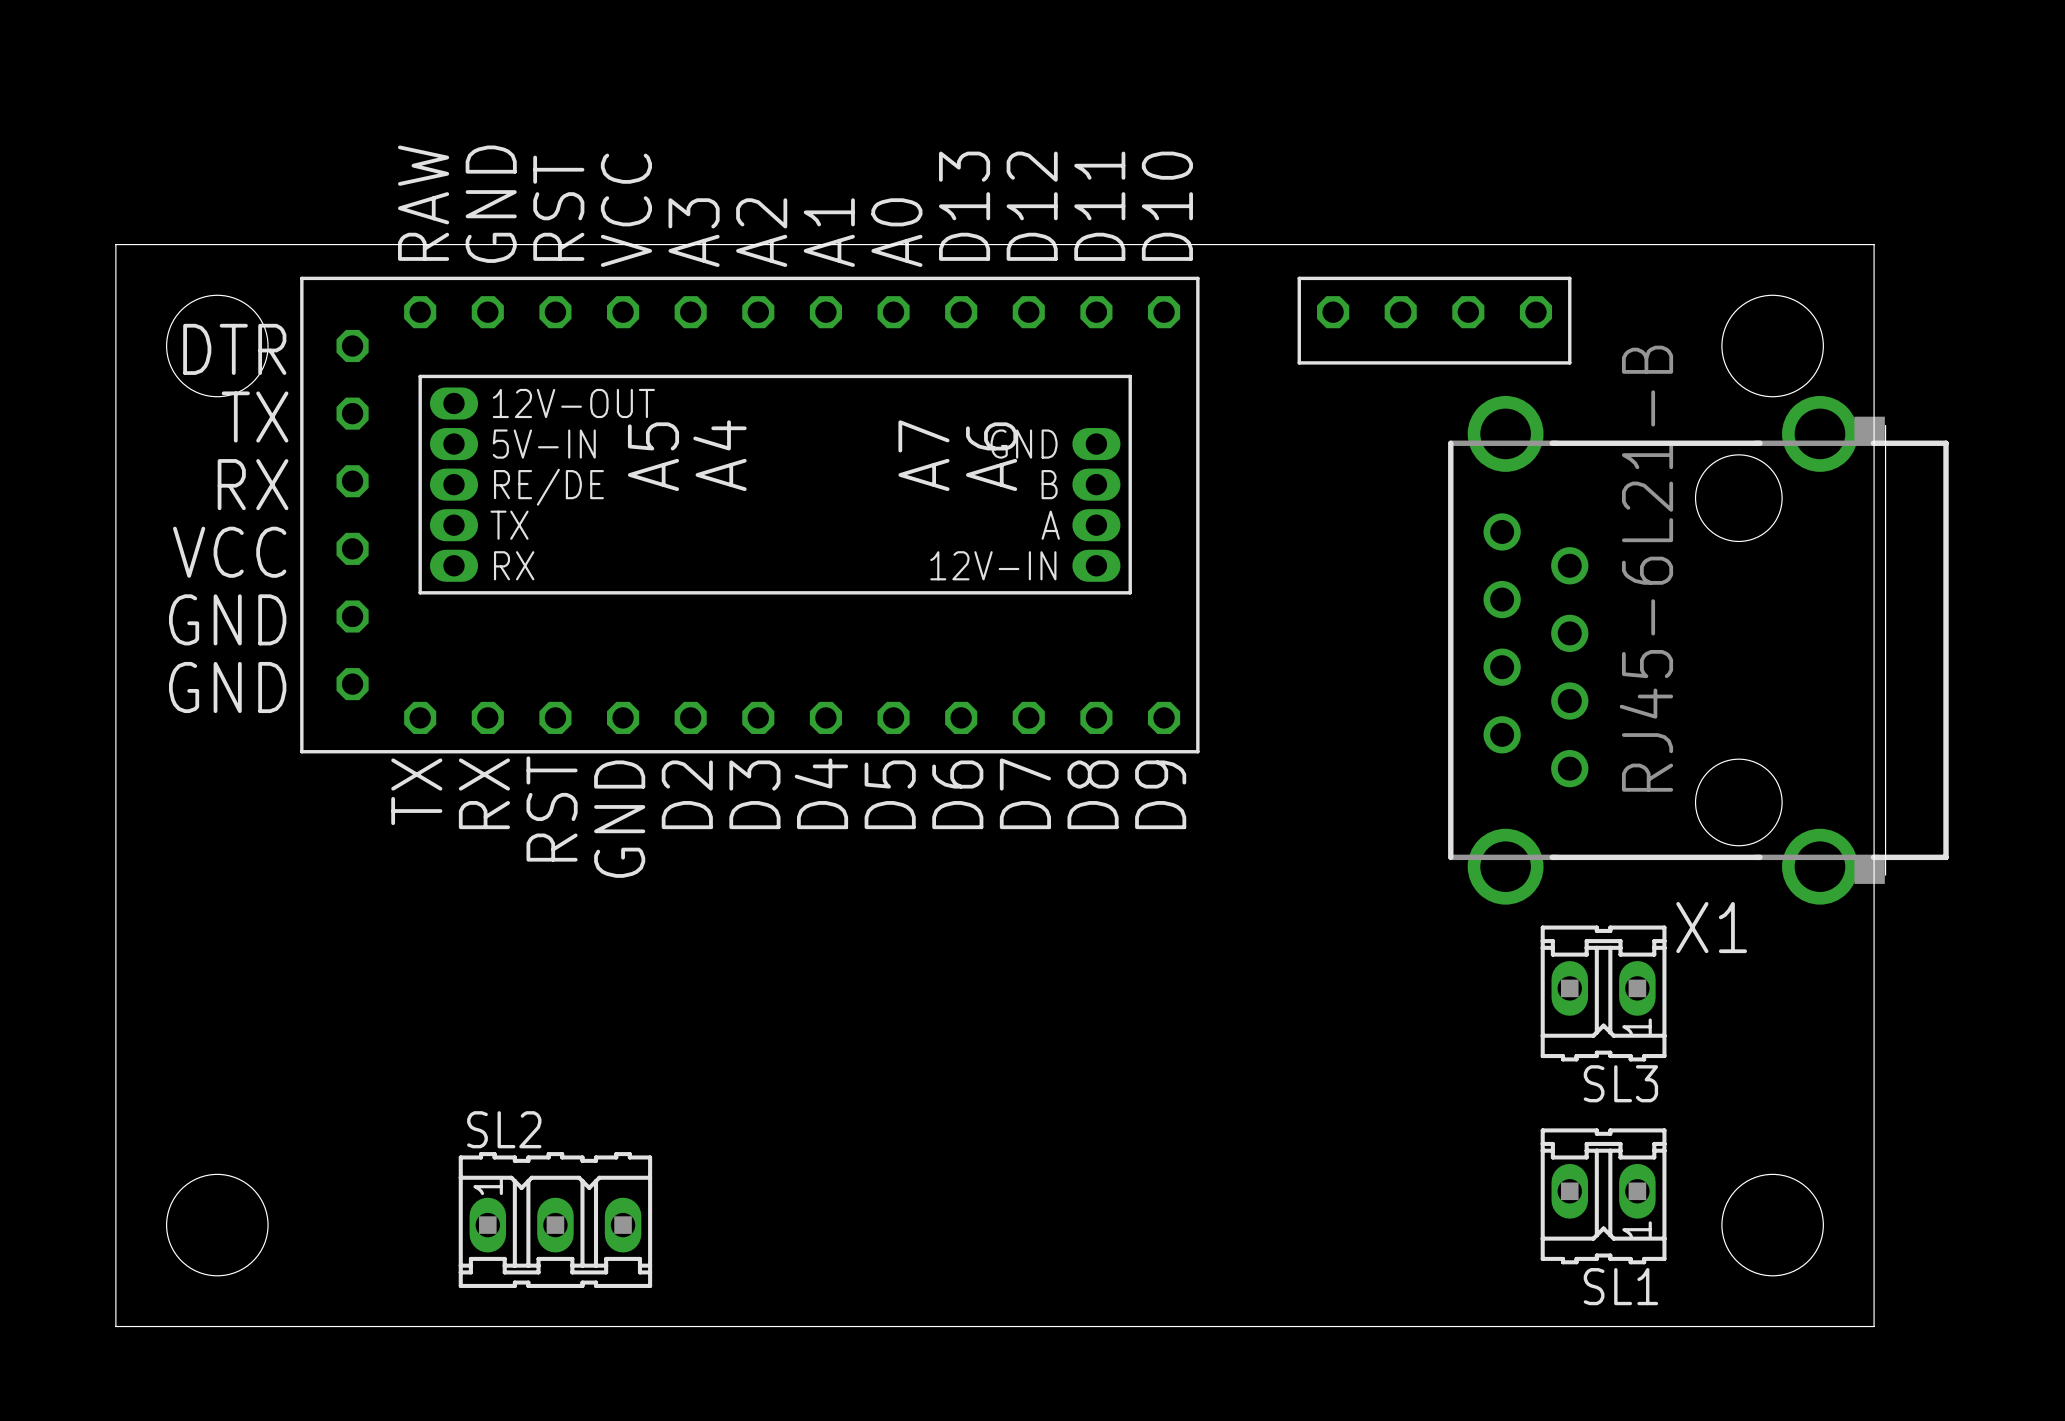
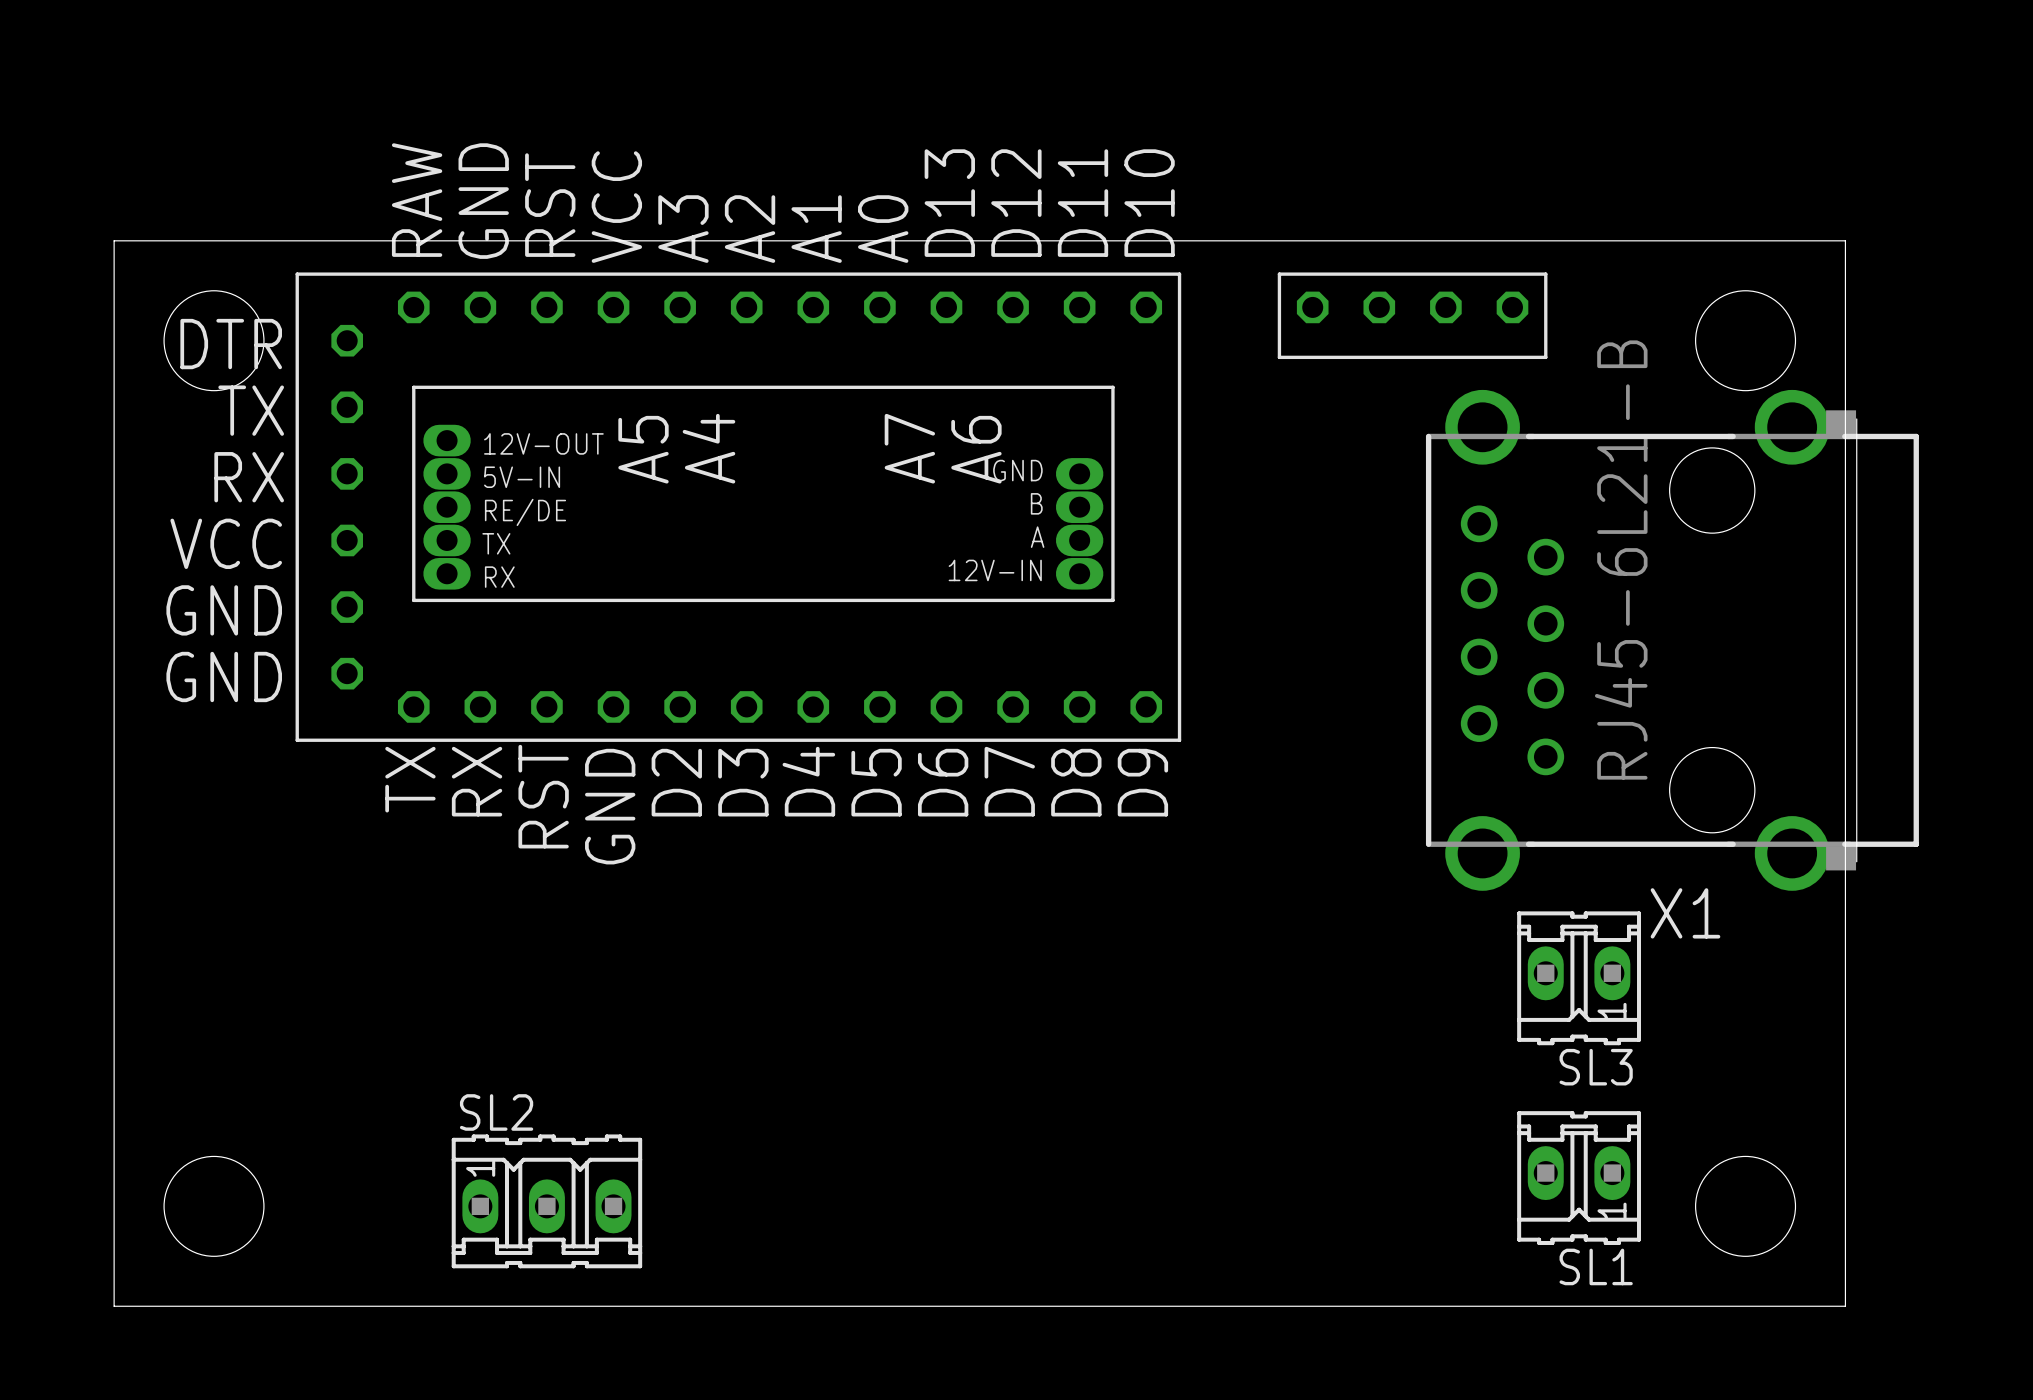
part footprint: [418, 374, 1132, 595] -> [412, 385, 1115, 603]

